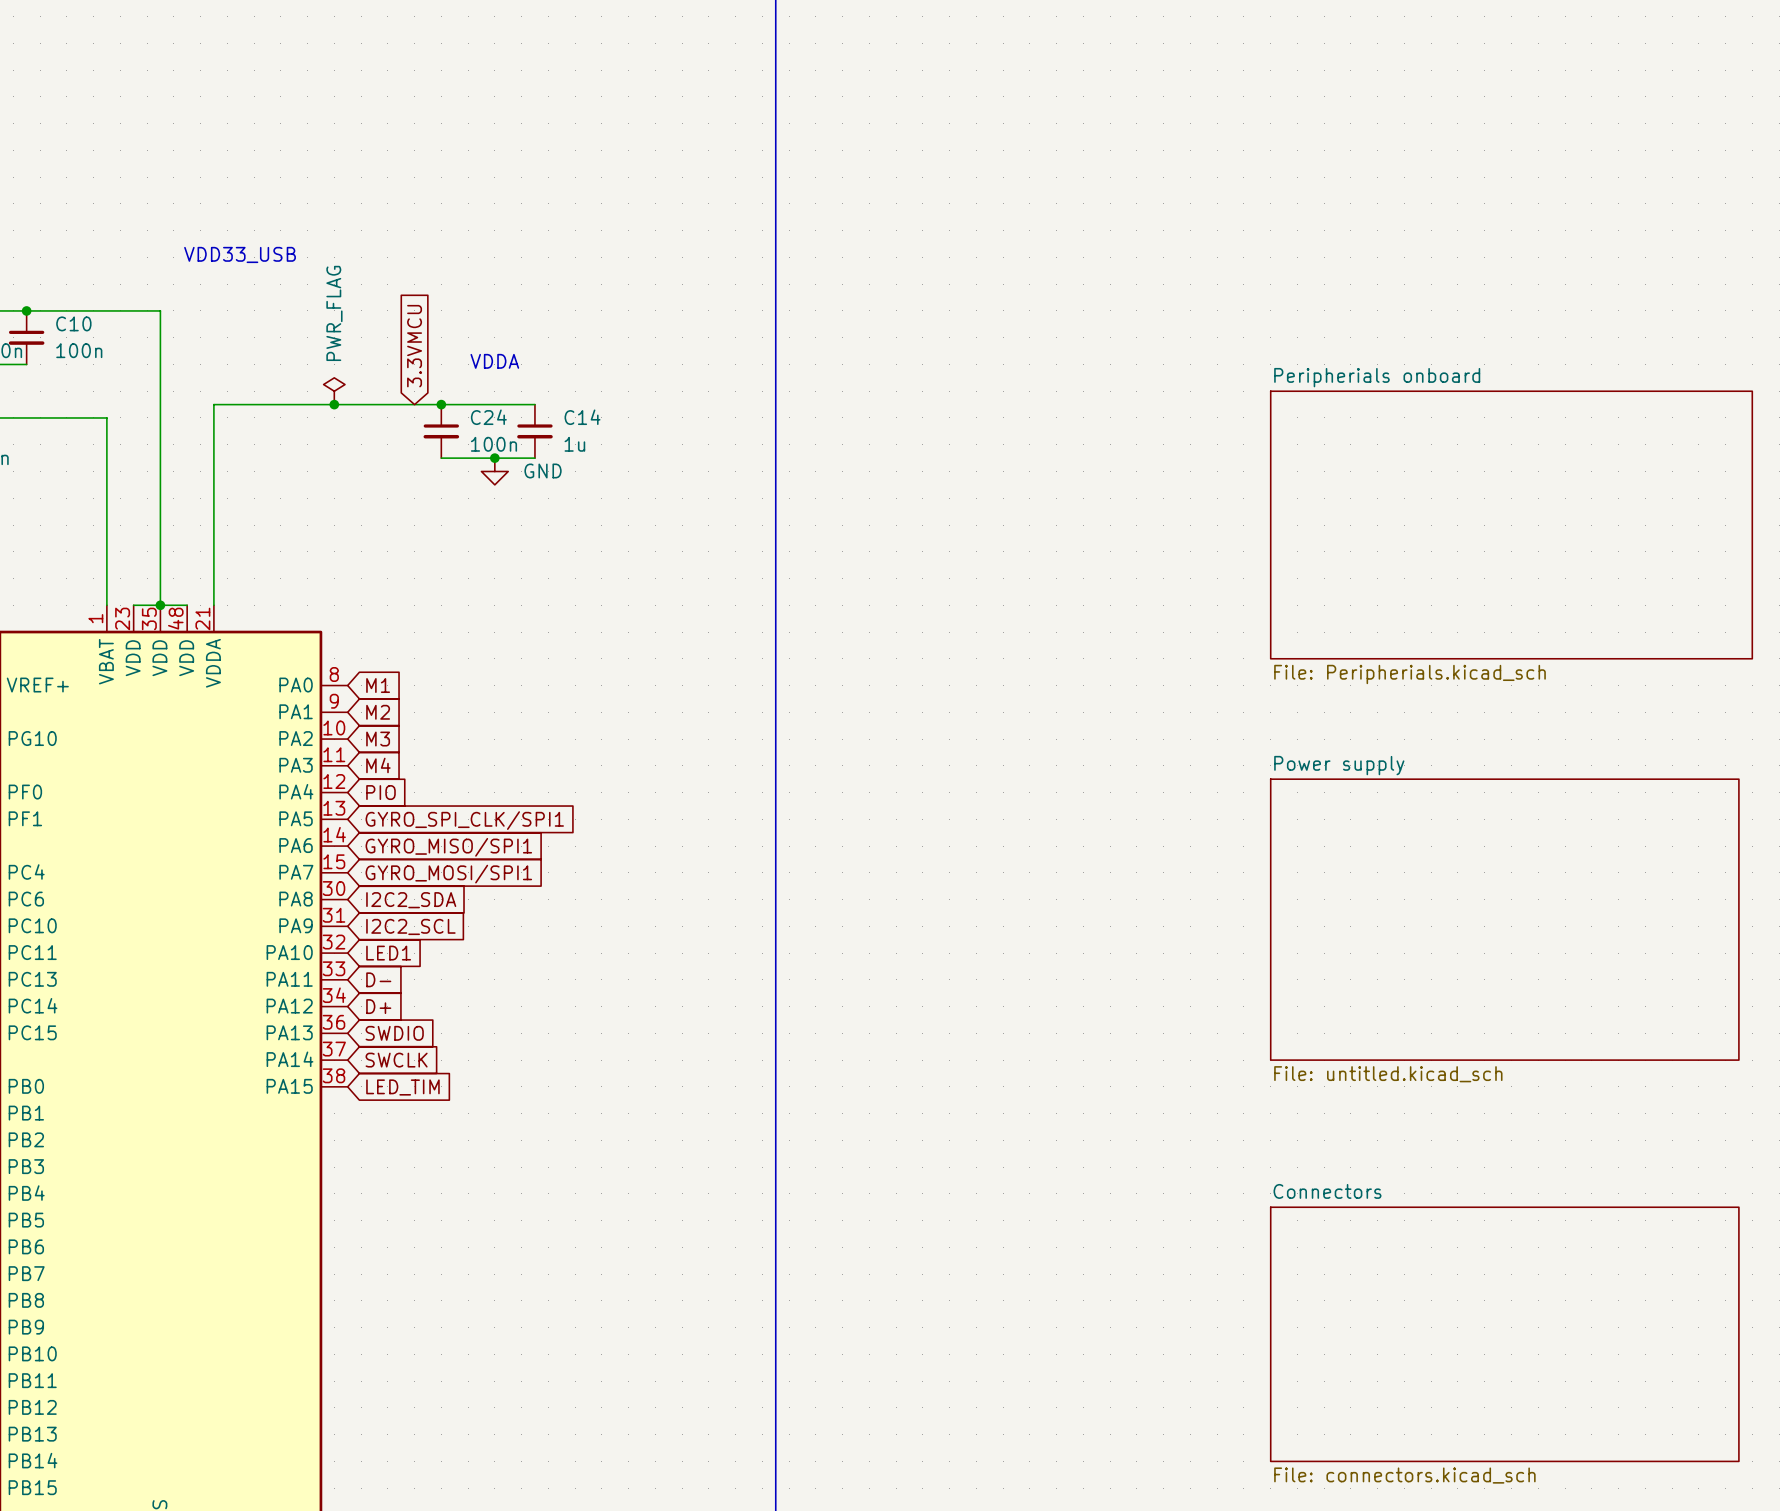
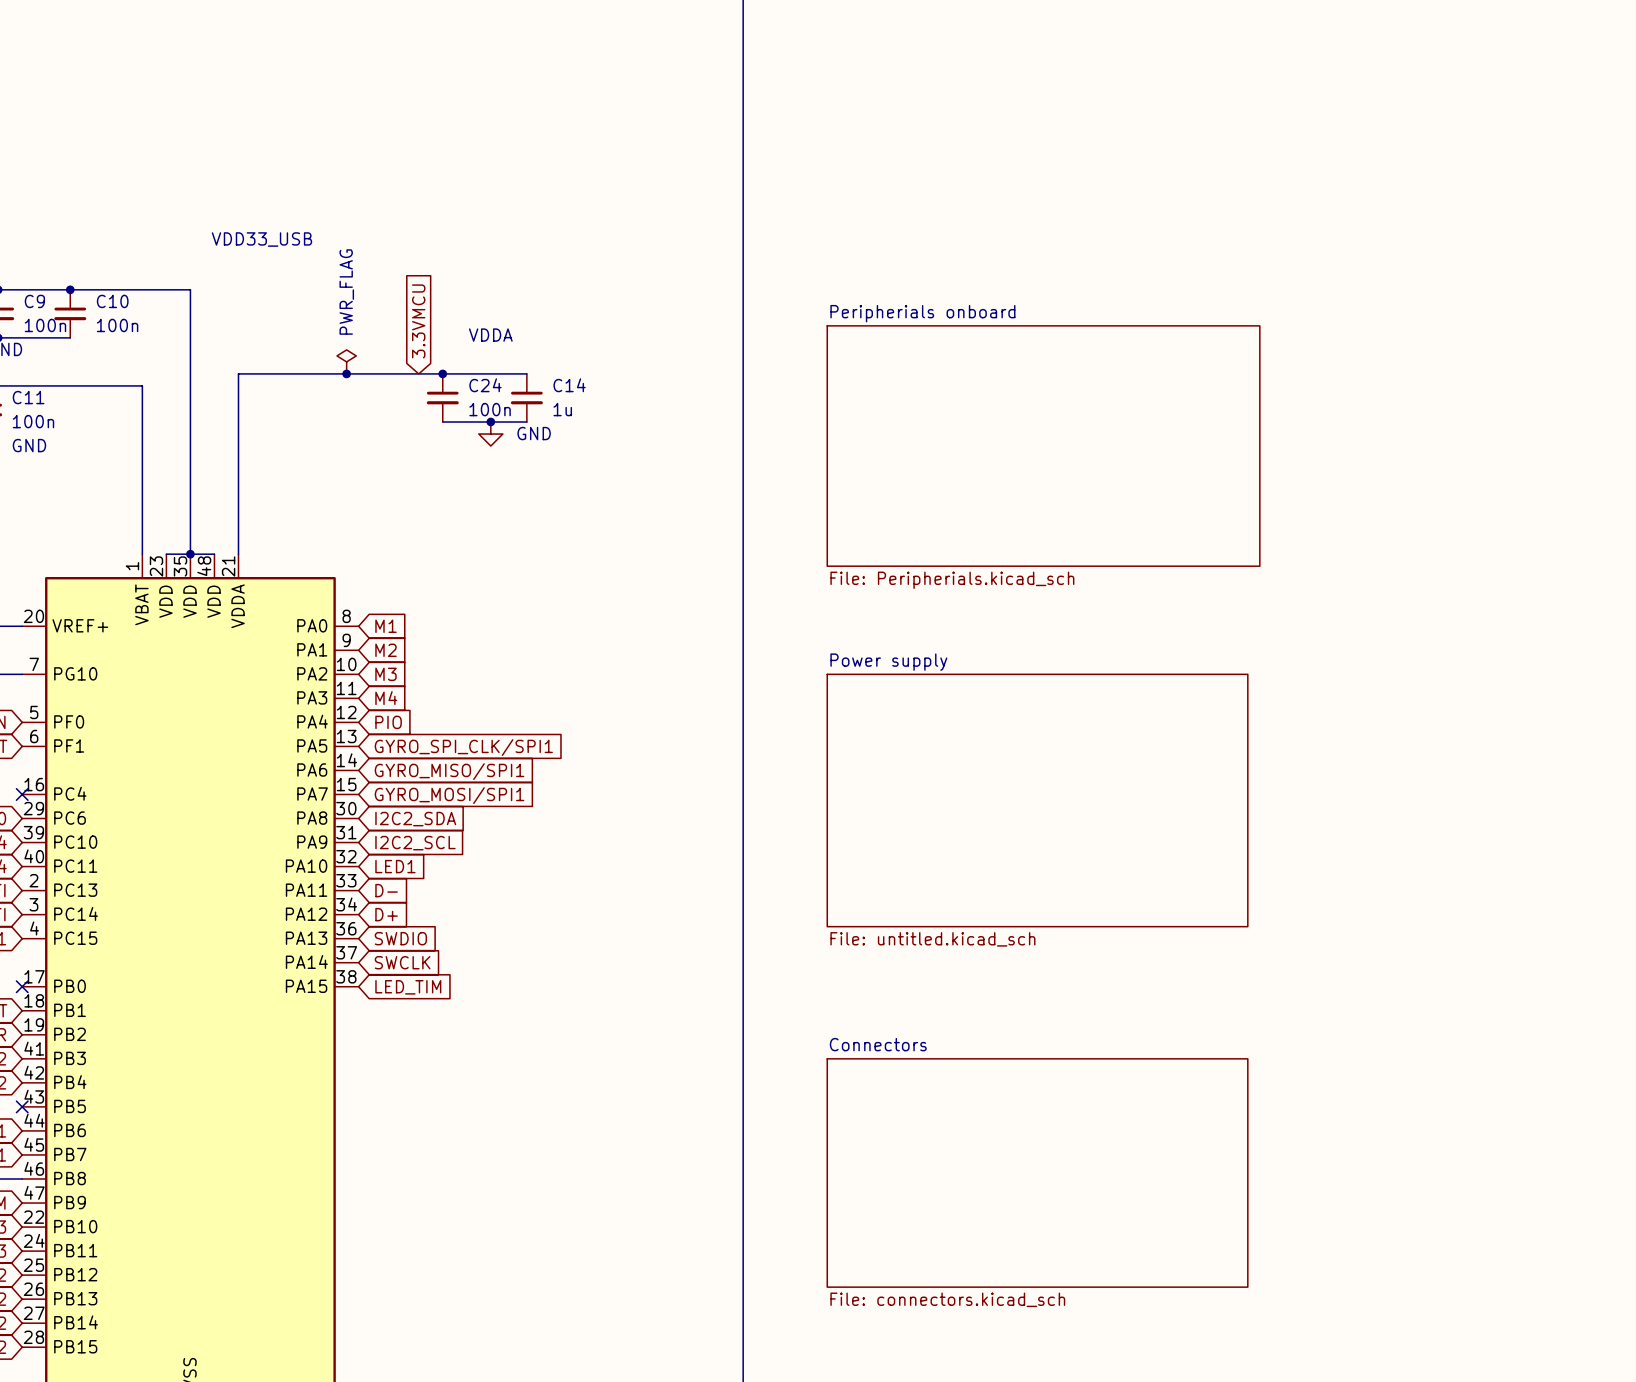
sheet Peripherials onboard: none -> File: Peripherials.kicad_sch (1043, 446)
sheet Peripherials onboard: File: Peripherials.kicad_sch (1511, 525) -> none
sheet Power supply: none -> File: untitled.kicad_sch (1037, 800)
sheet Power supply: File: untitled.kicad_sch (1504, 919) -> none
sheet Connectors: none -> File: connectors.kicad_sch (1037, 1172)
sheet Connectors: File: connectors.kicad_sch (1504, 1334) -> none

